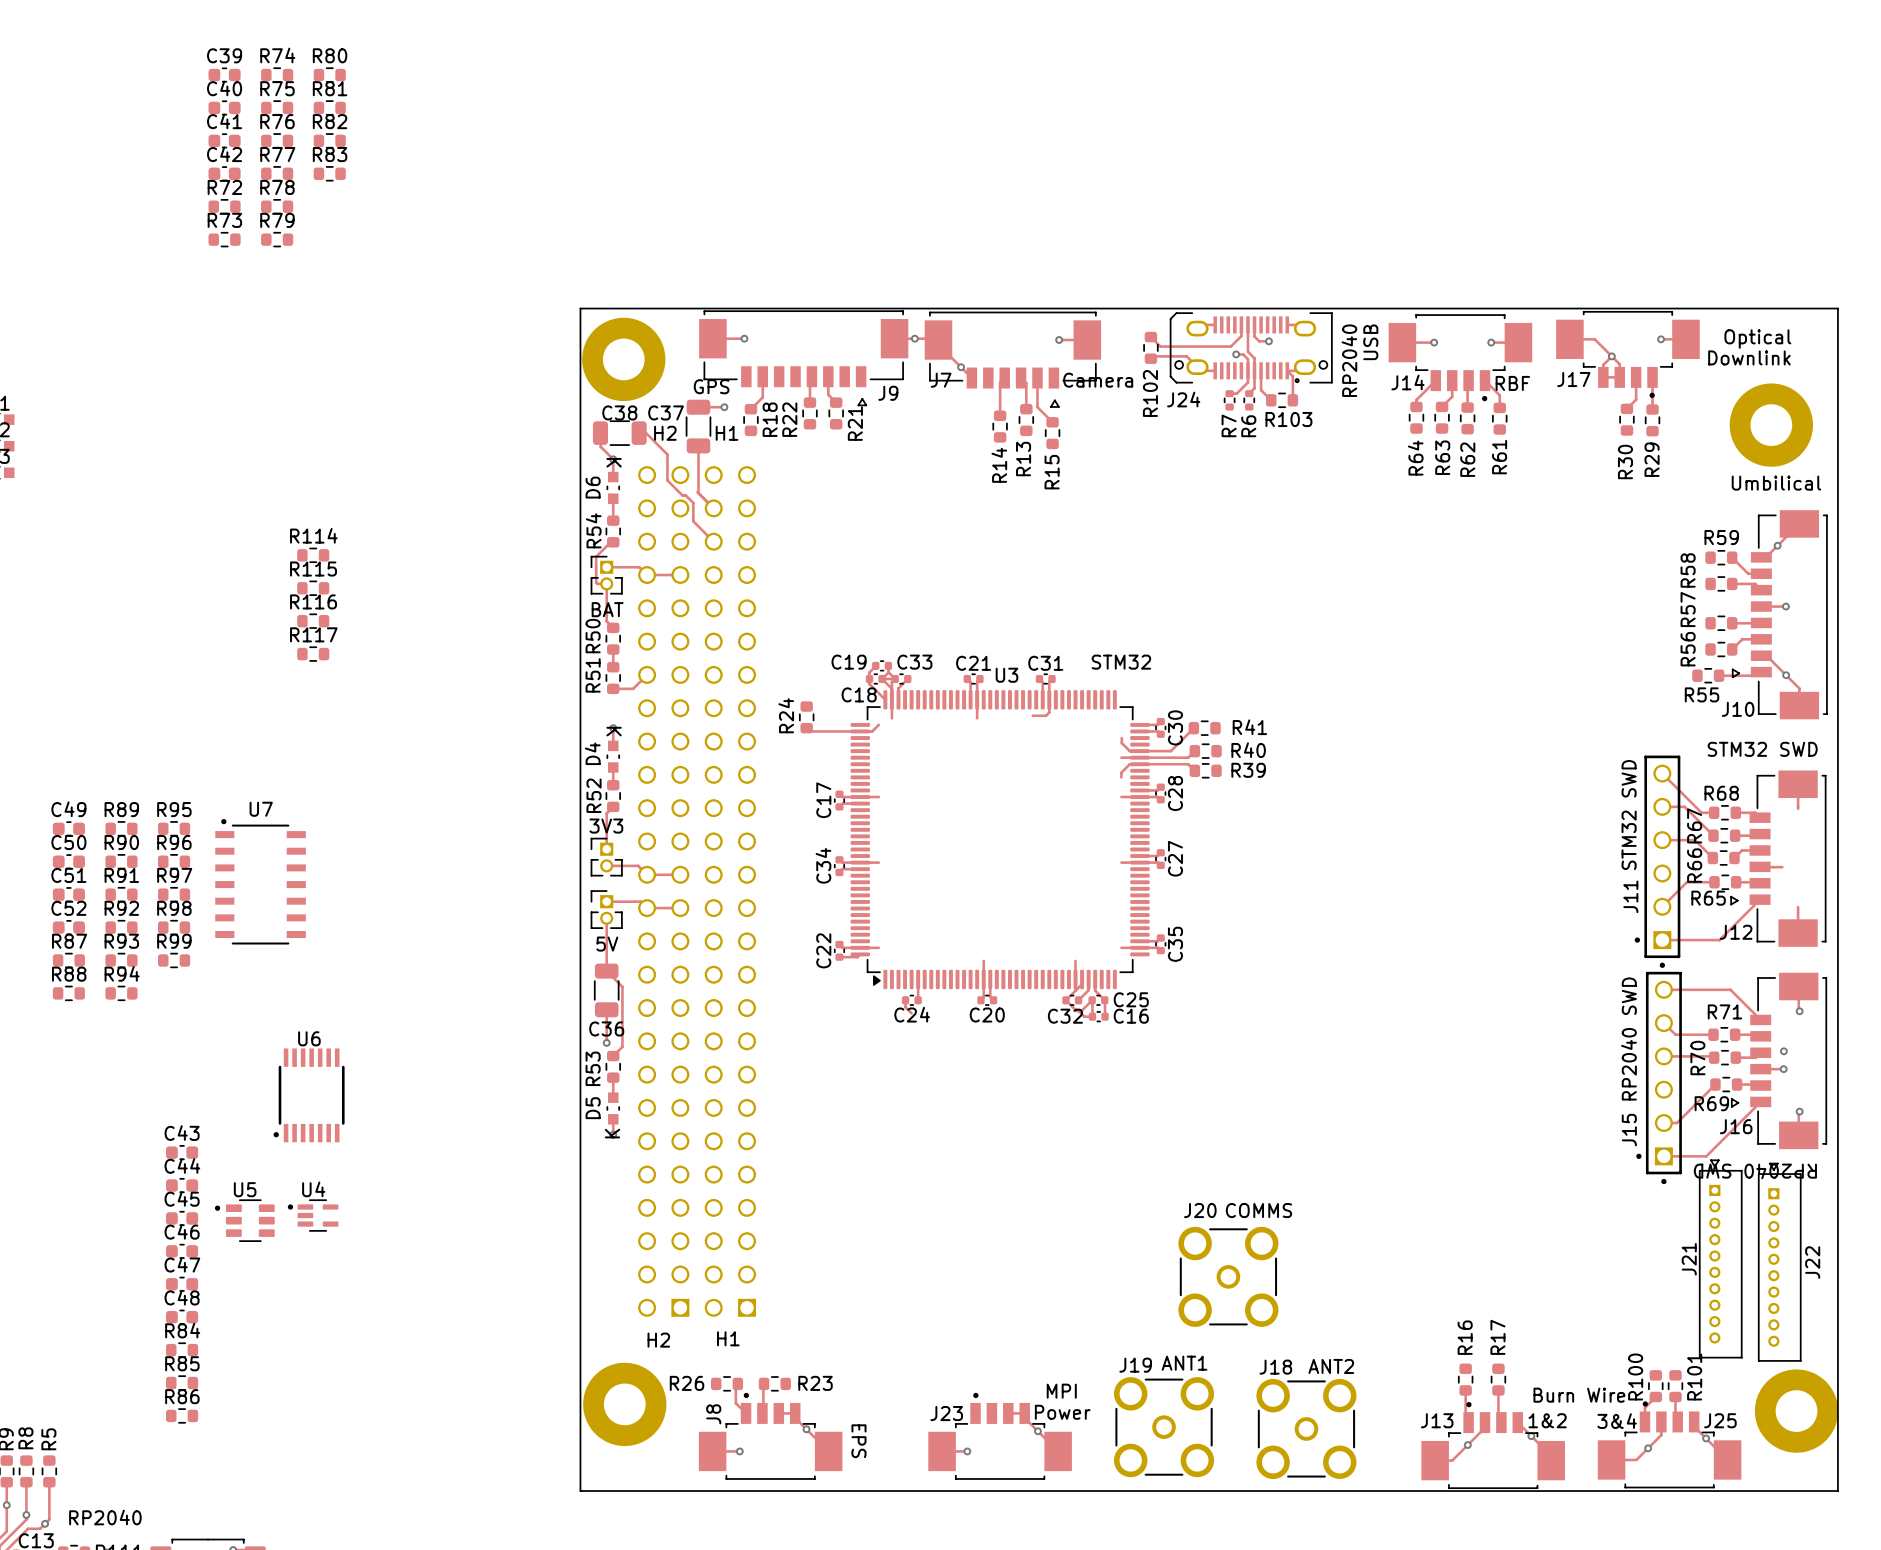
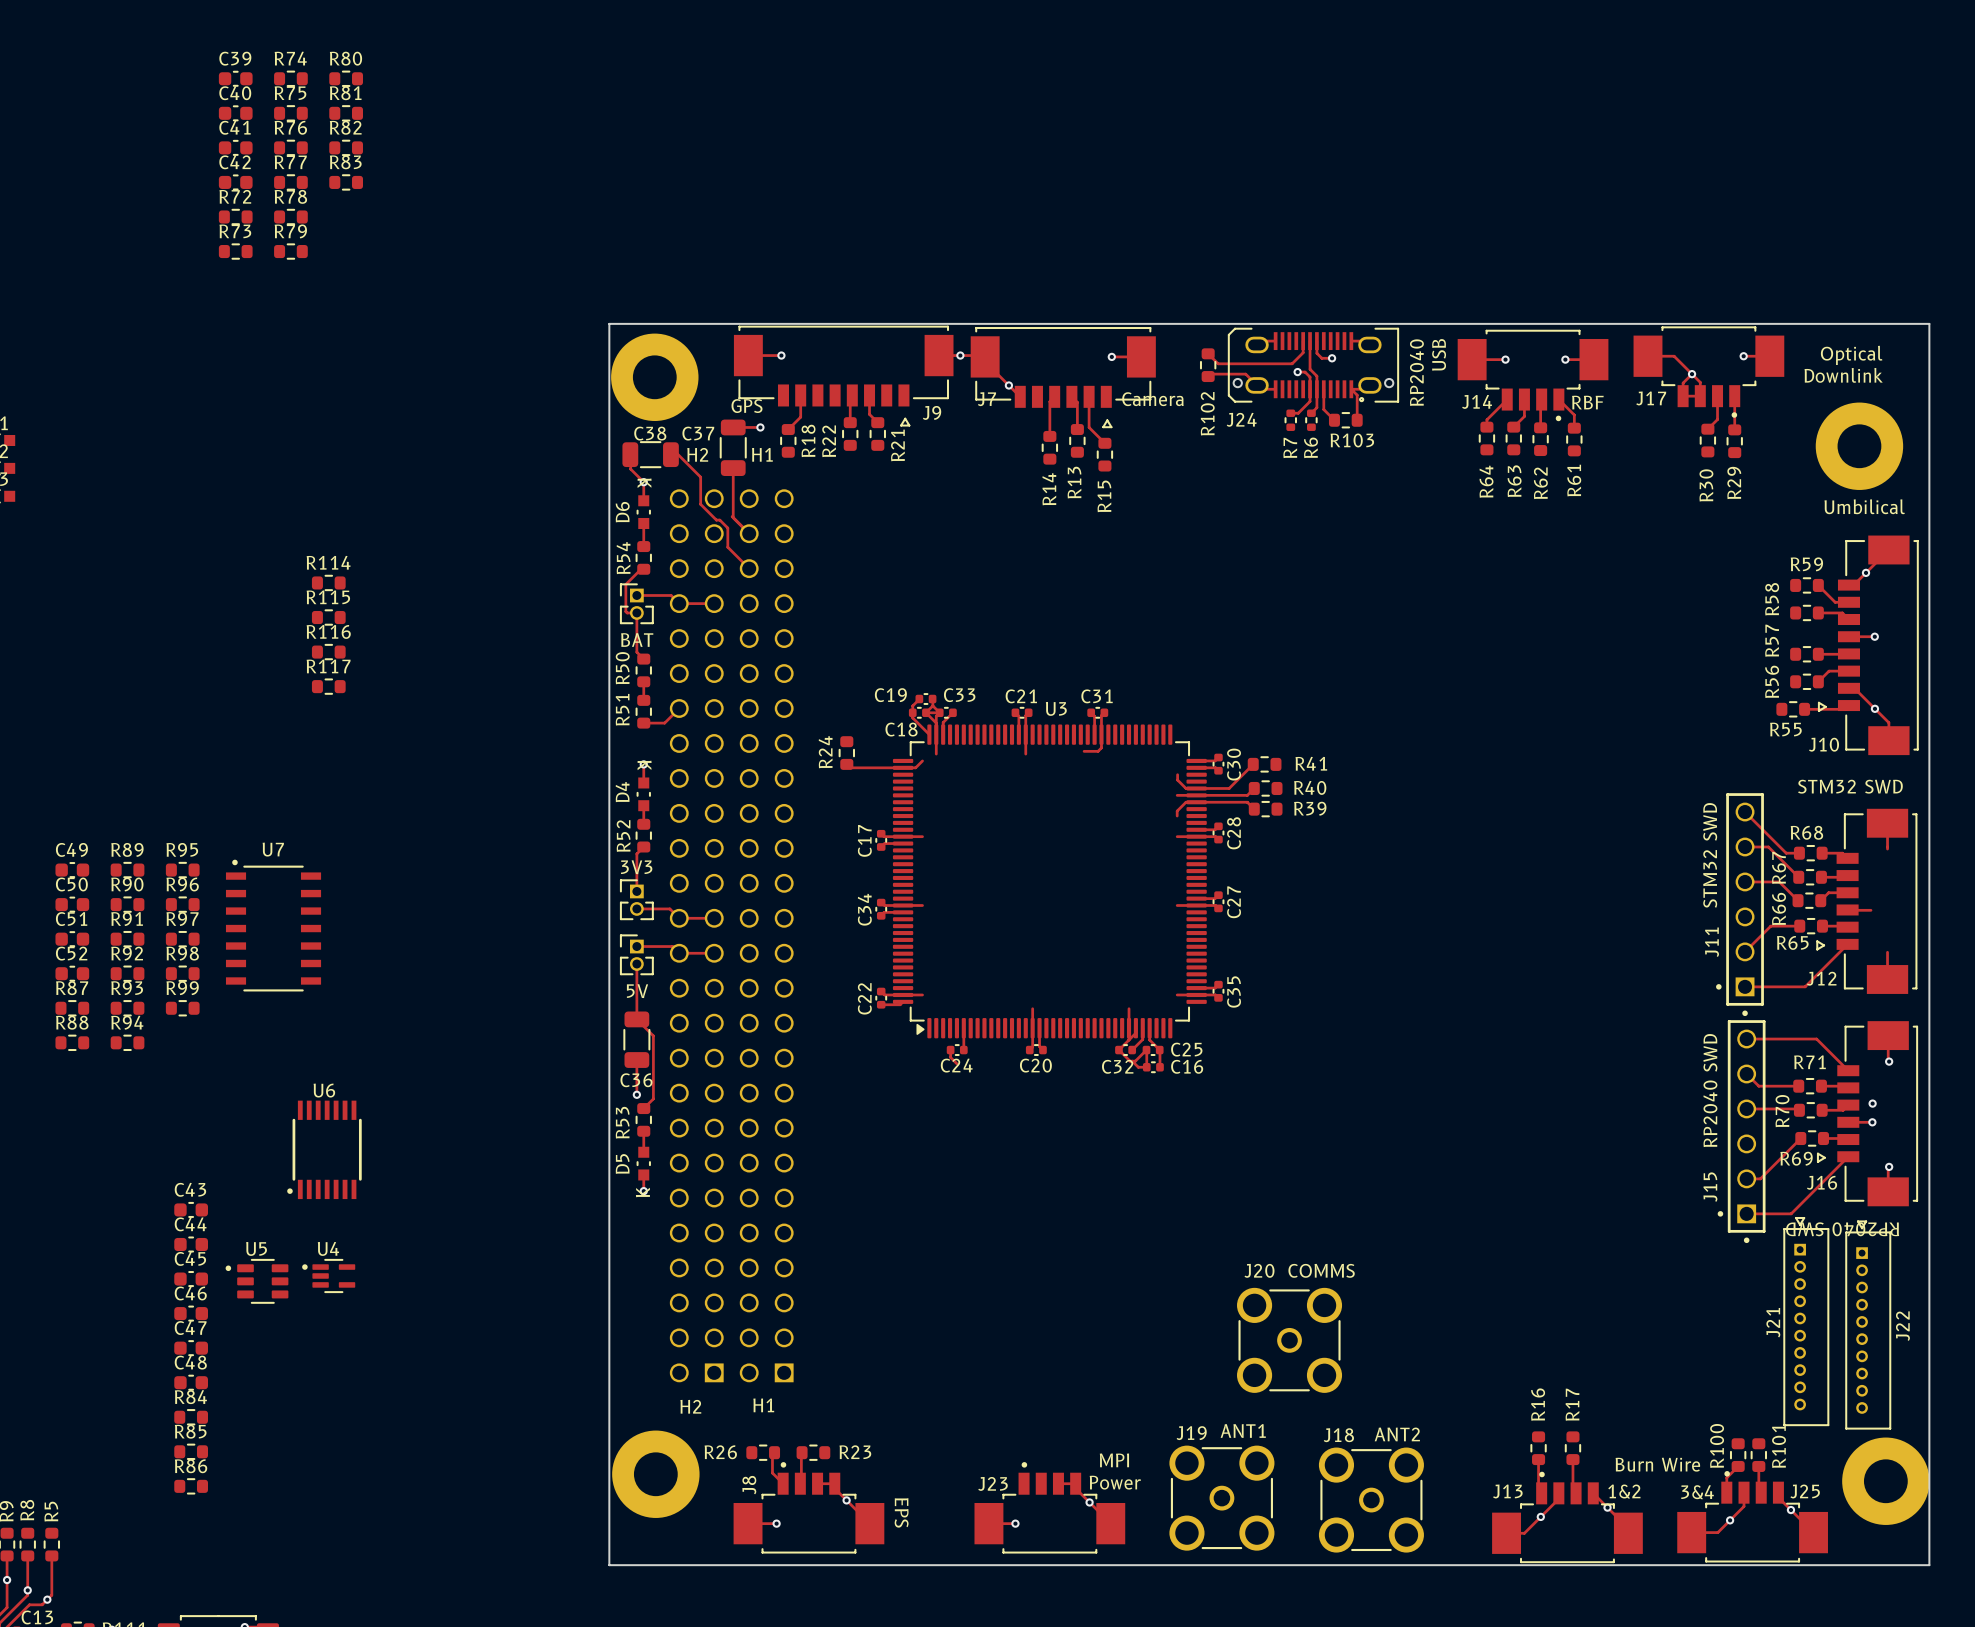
text: STM32 (1121, 662) -> none
text: RP2040 (105, 1517) -> none

